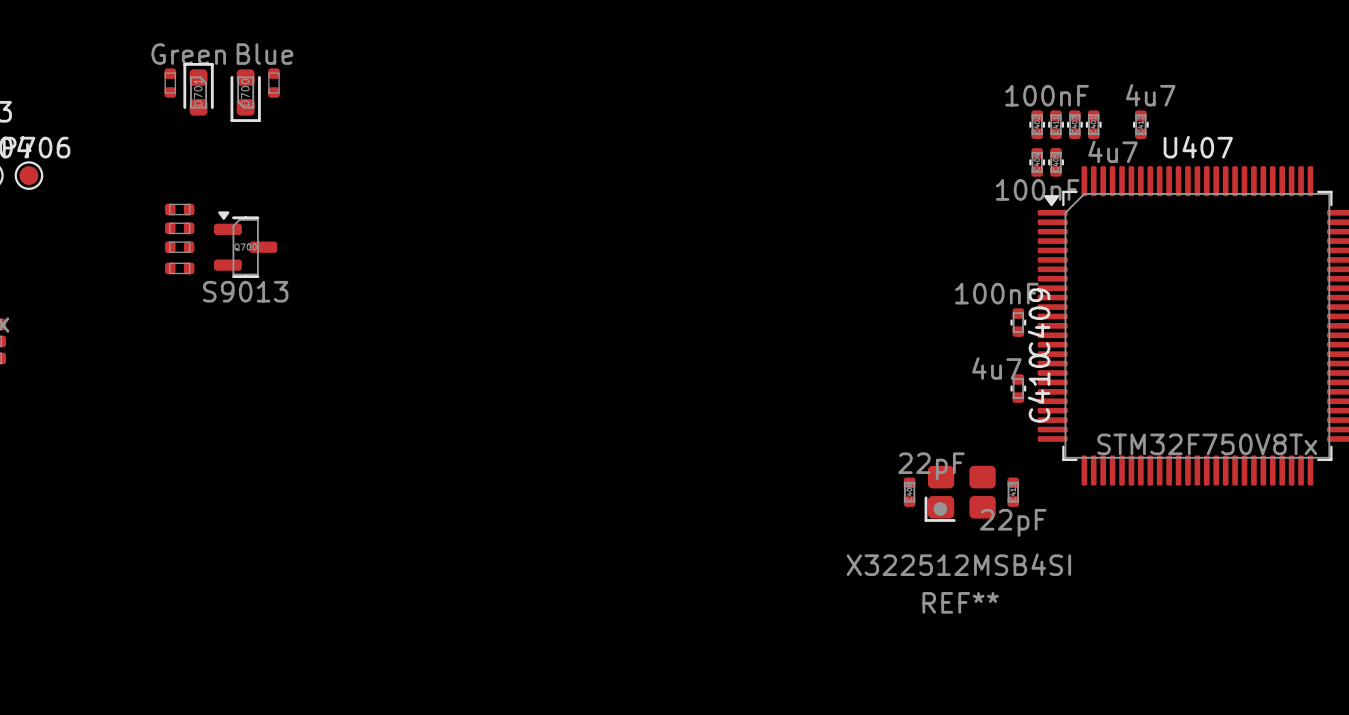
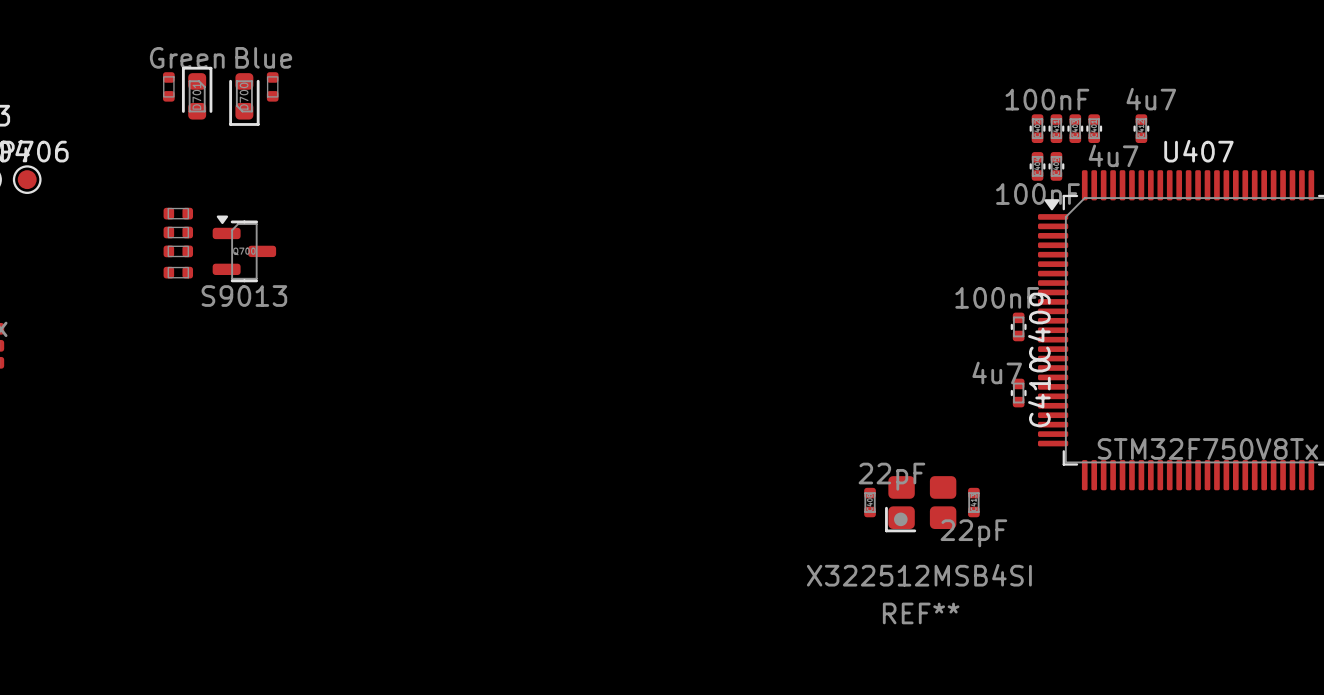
part position: (909, 492) -> (870, 502)
part position: (1013, 492) -> (973, 502)
part position: (960, 493) -> (920, 504)

